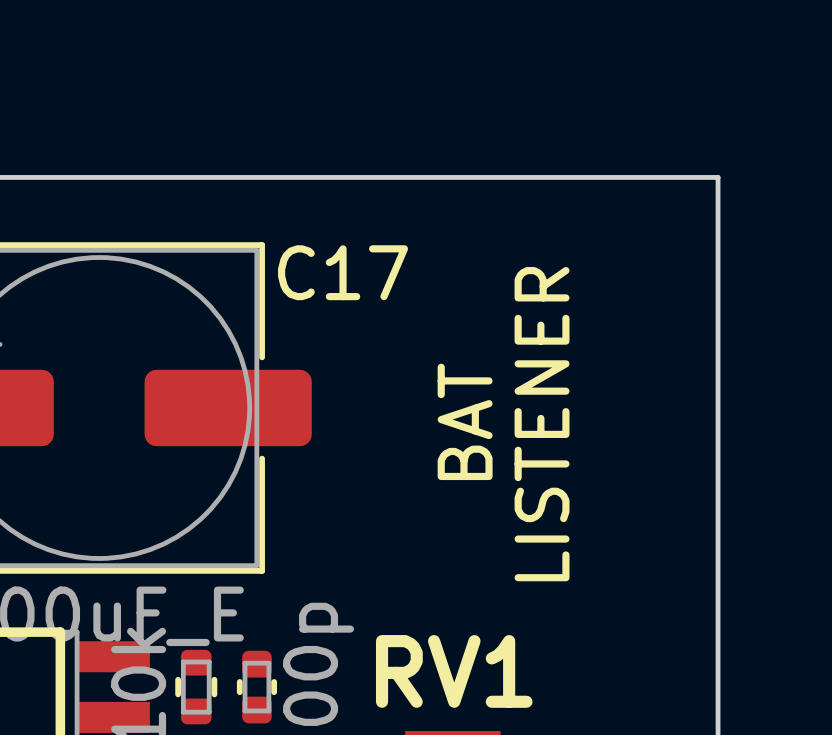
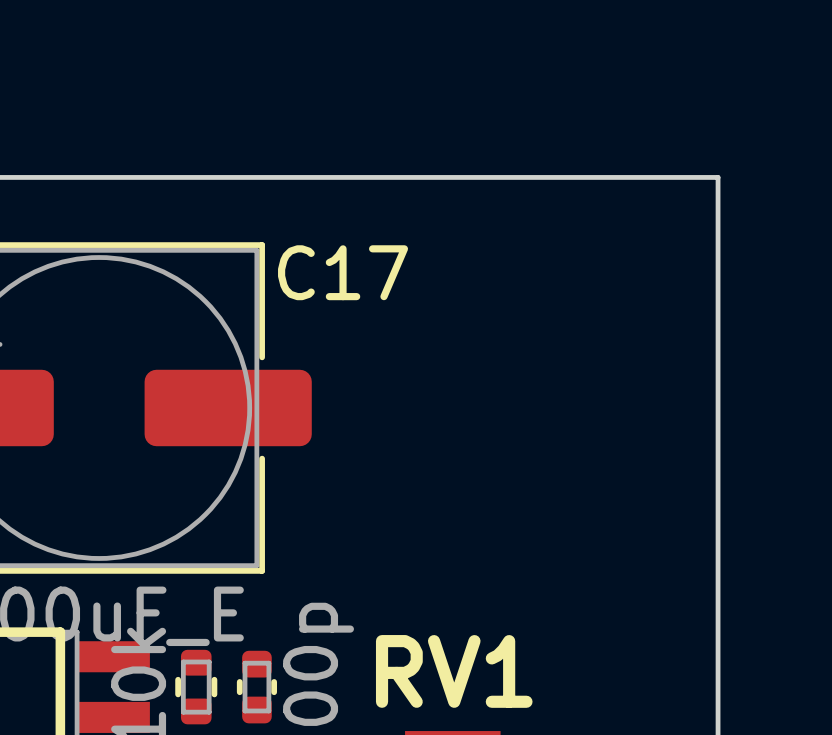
text: BAT (465, 421) -> none
text: LISTENER (542, 424) -> none

